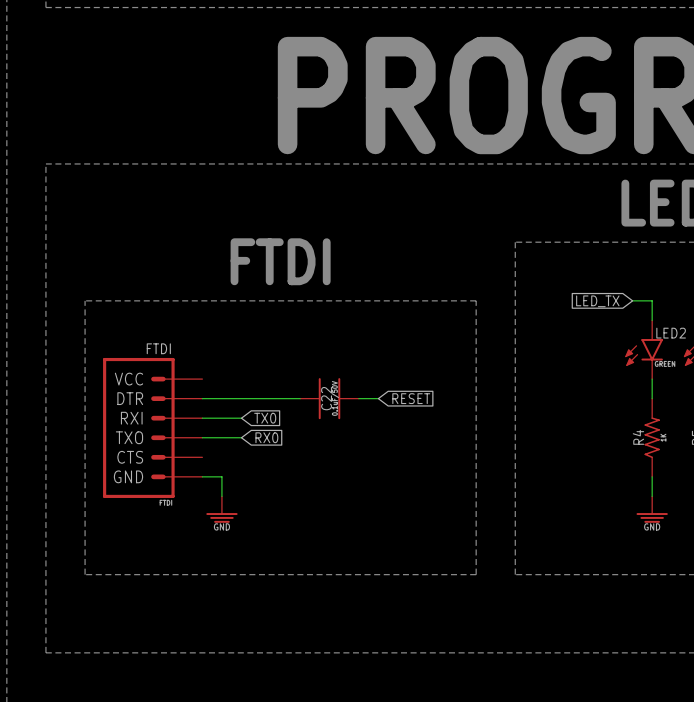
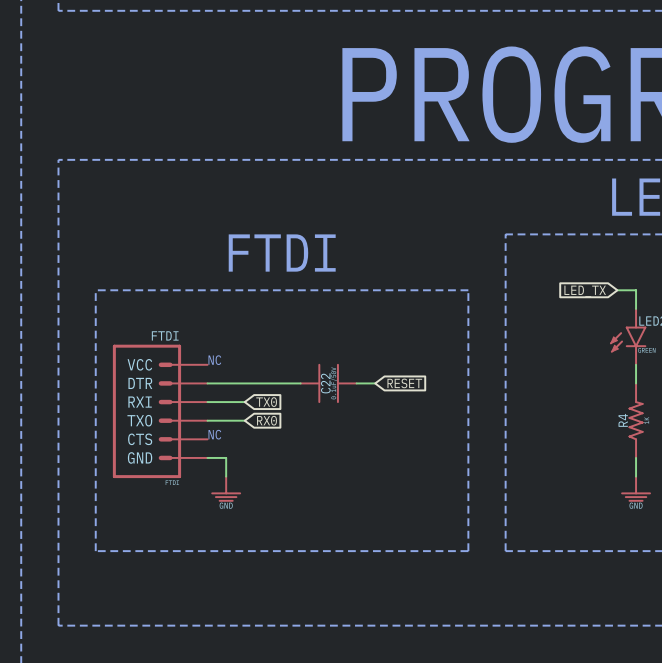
text: none -> NC (214, 360)
text: none -> NC (214, 434)

